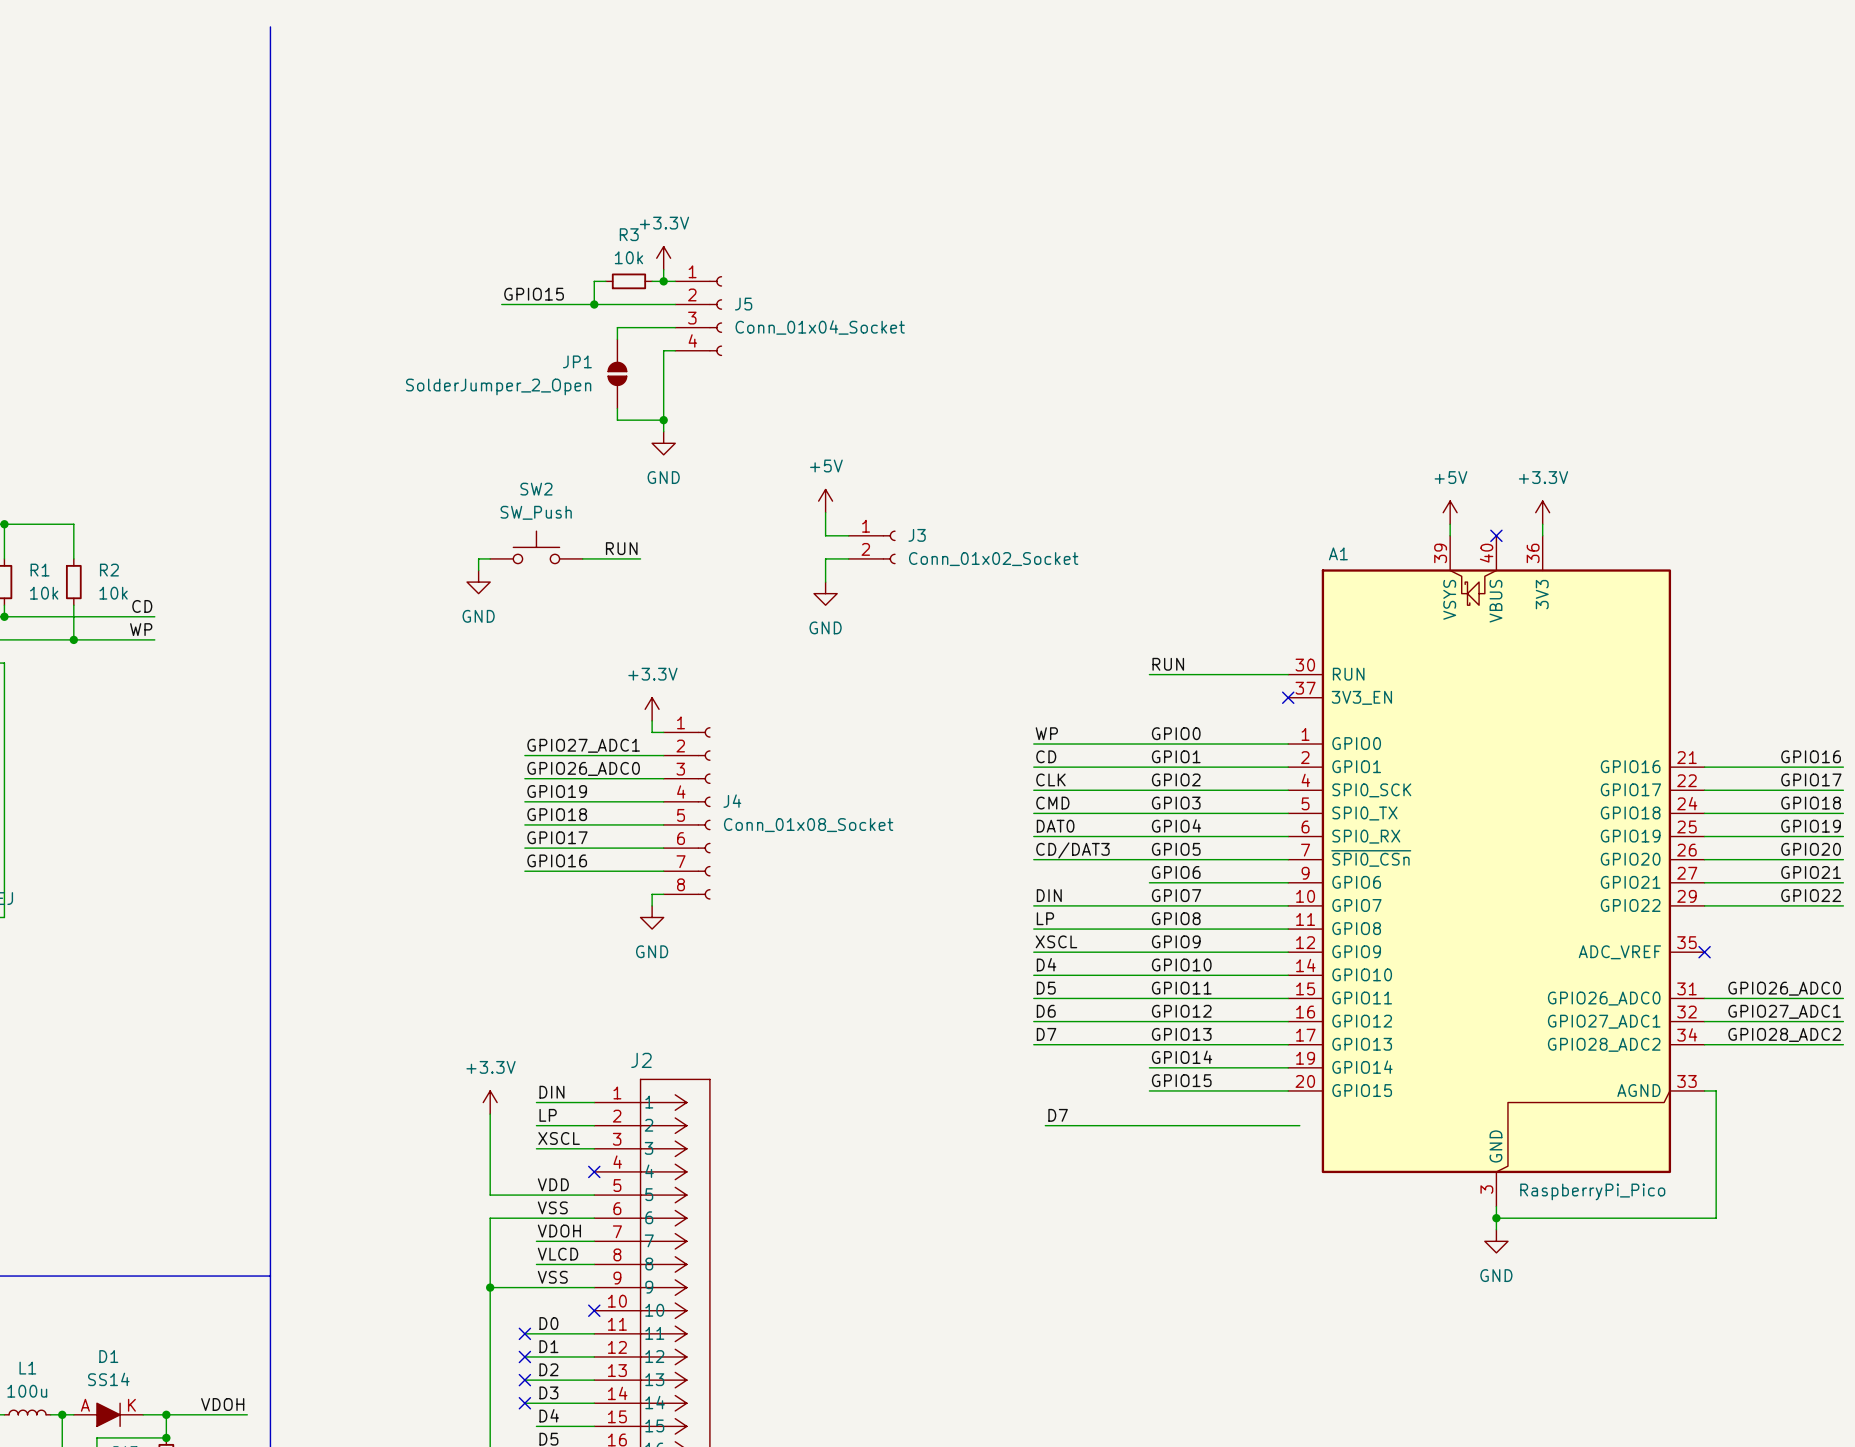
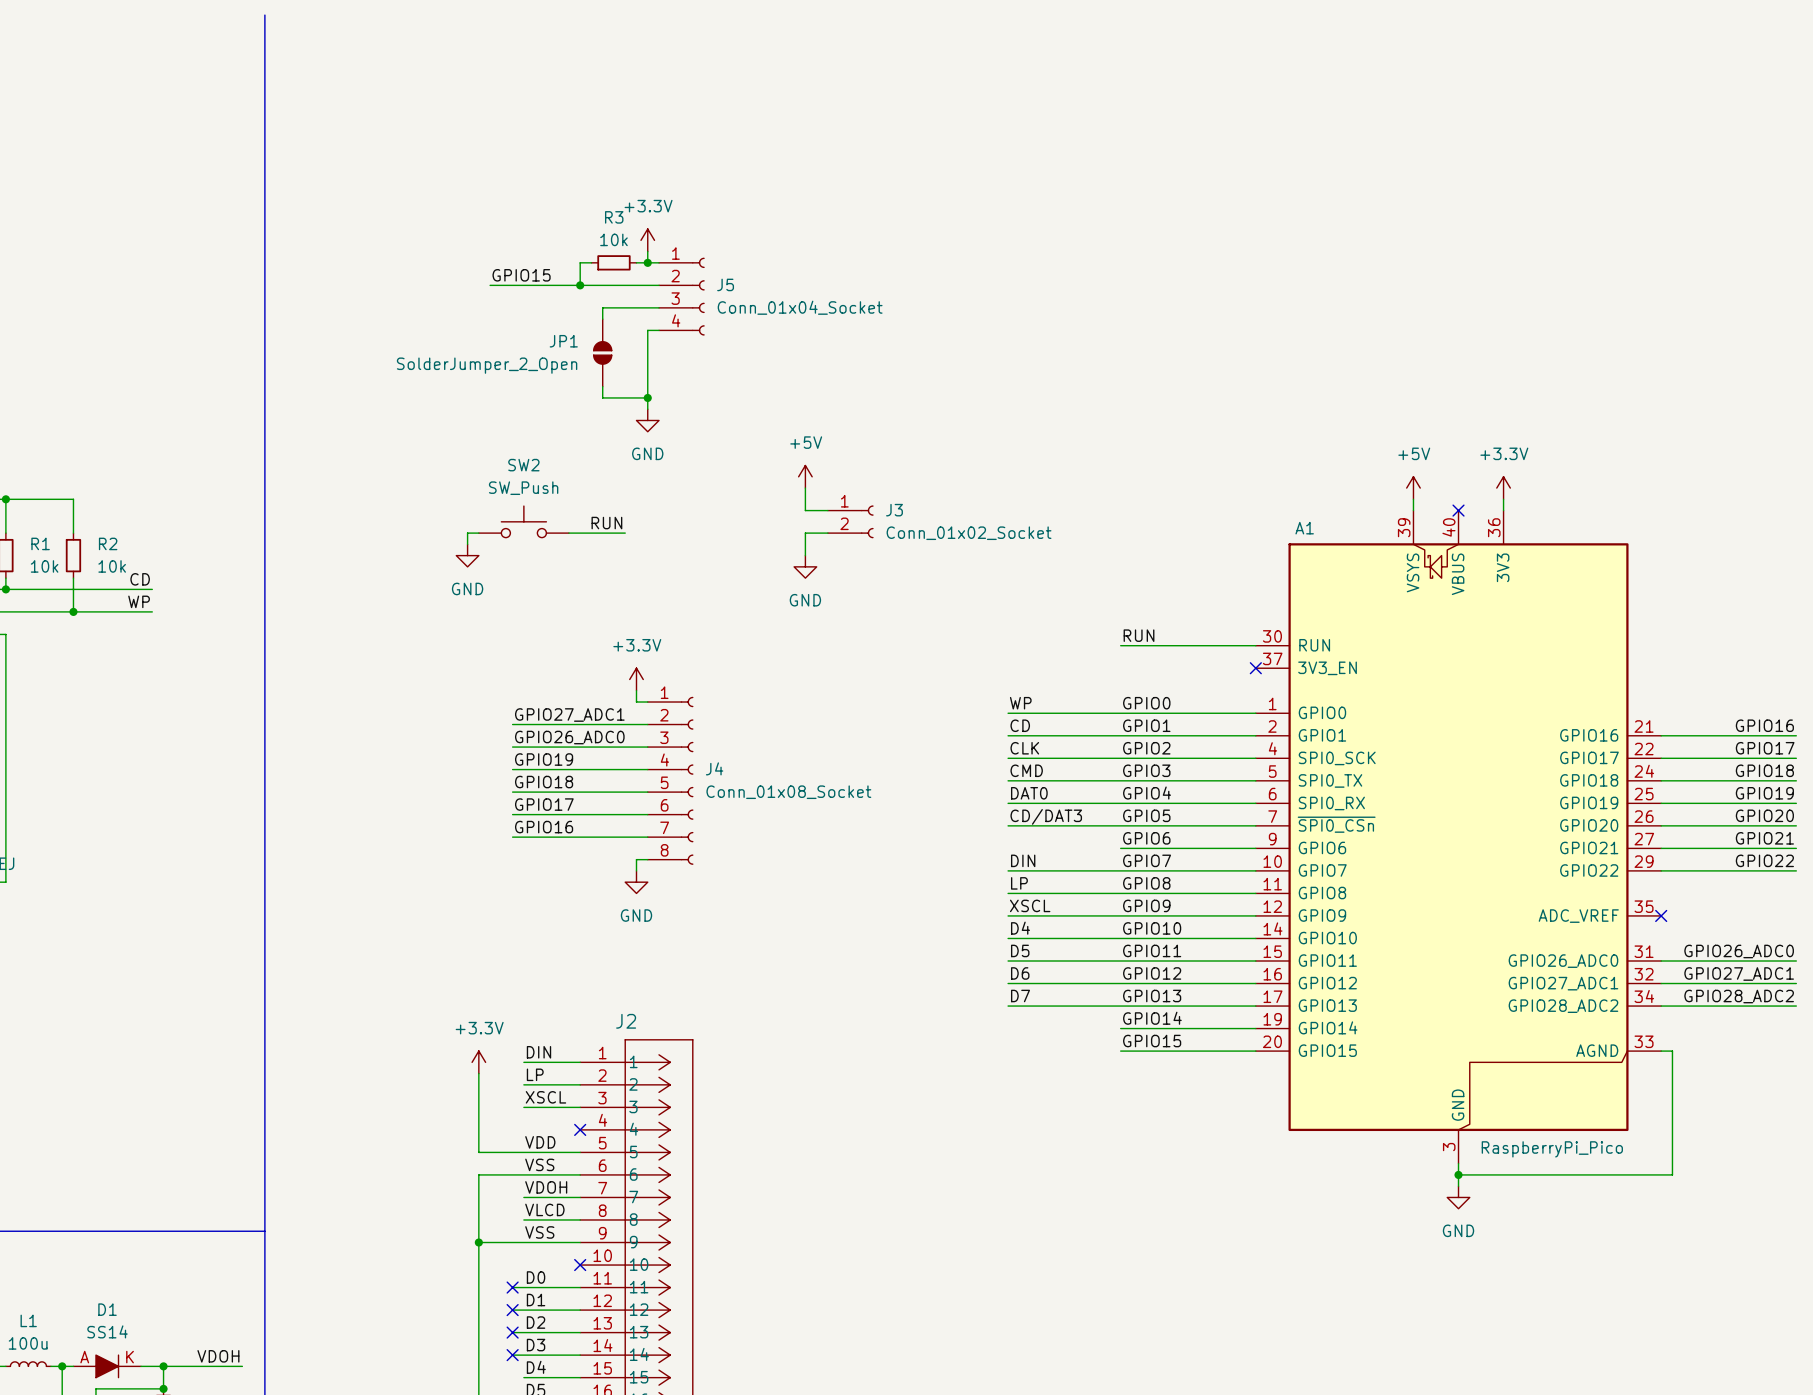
label: D7 (1058, 1115) -> none
wire: (1045, 1125) (1299, 1125) -> none

